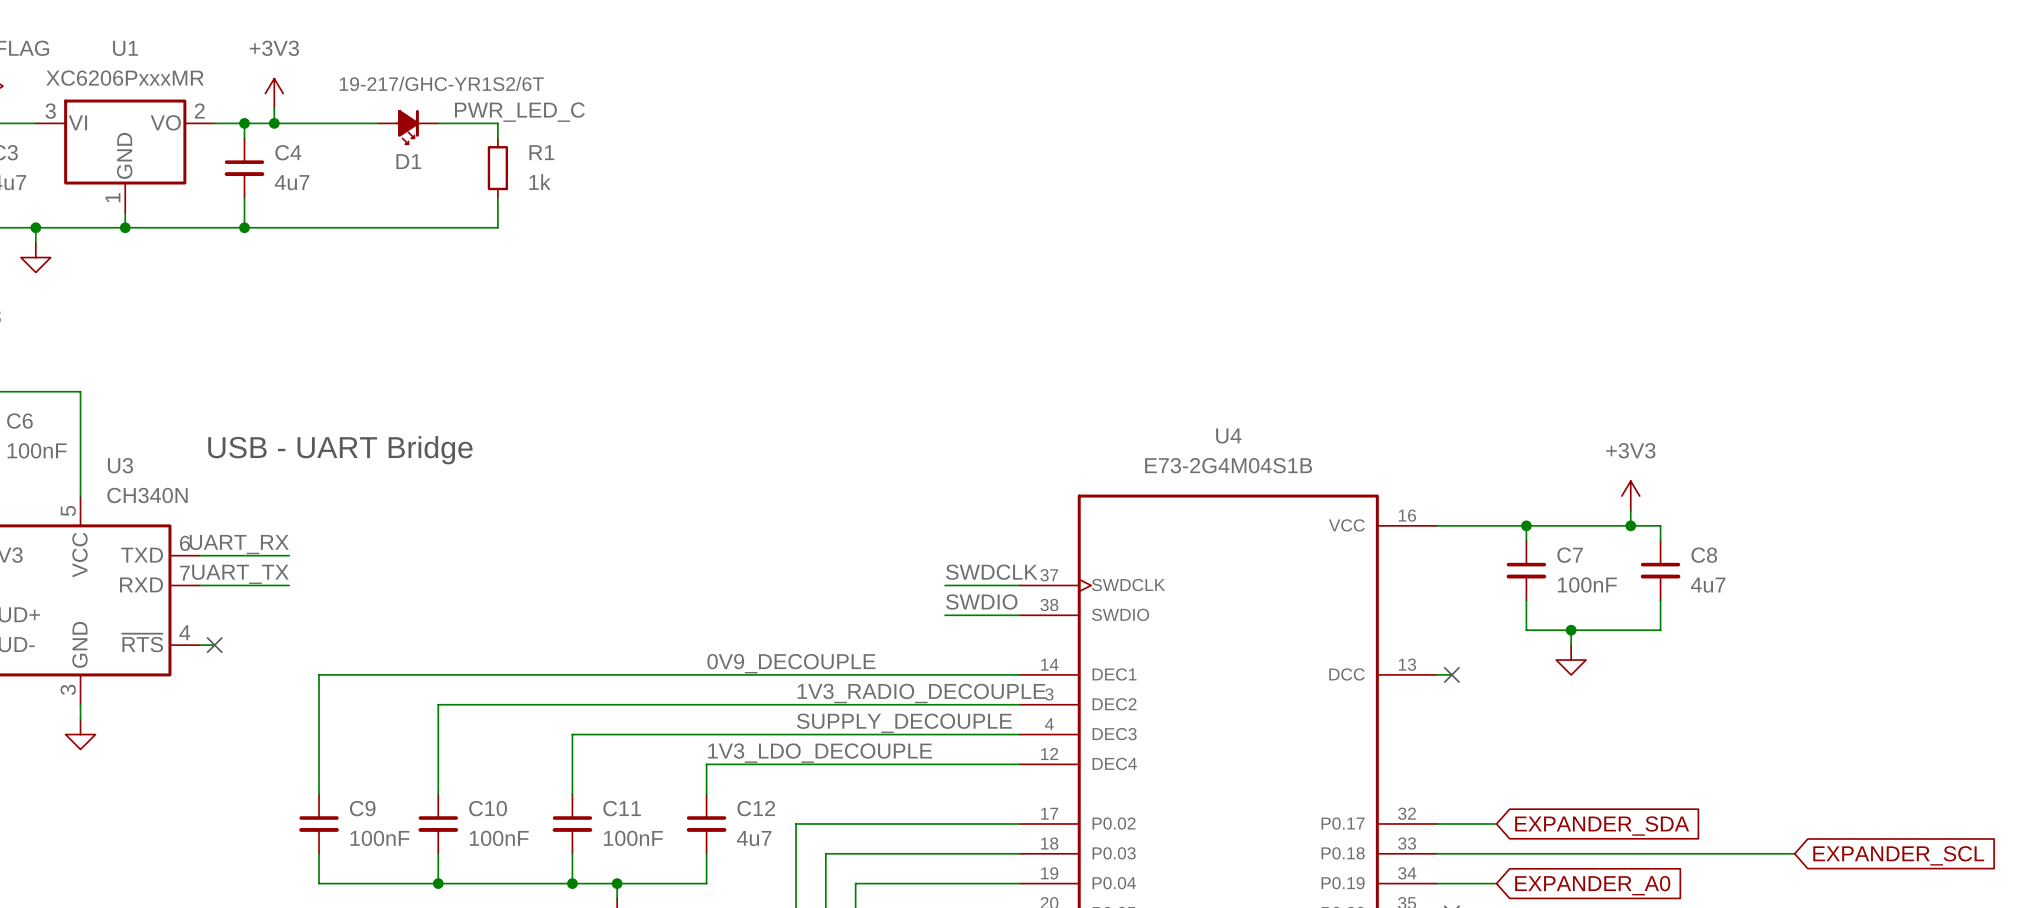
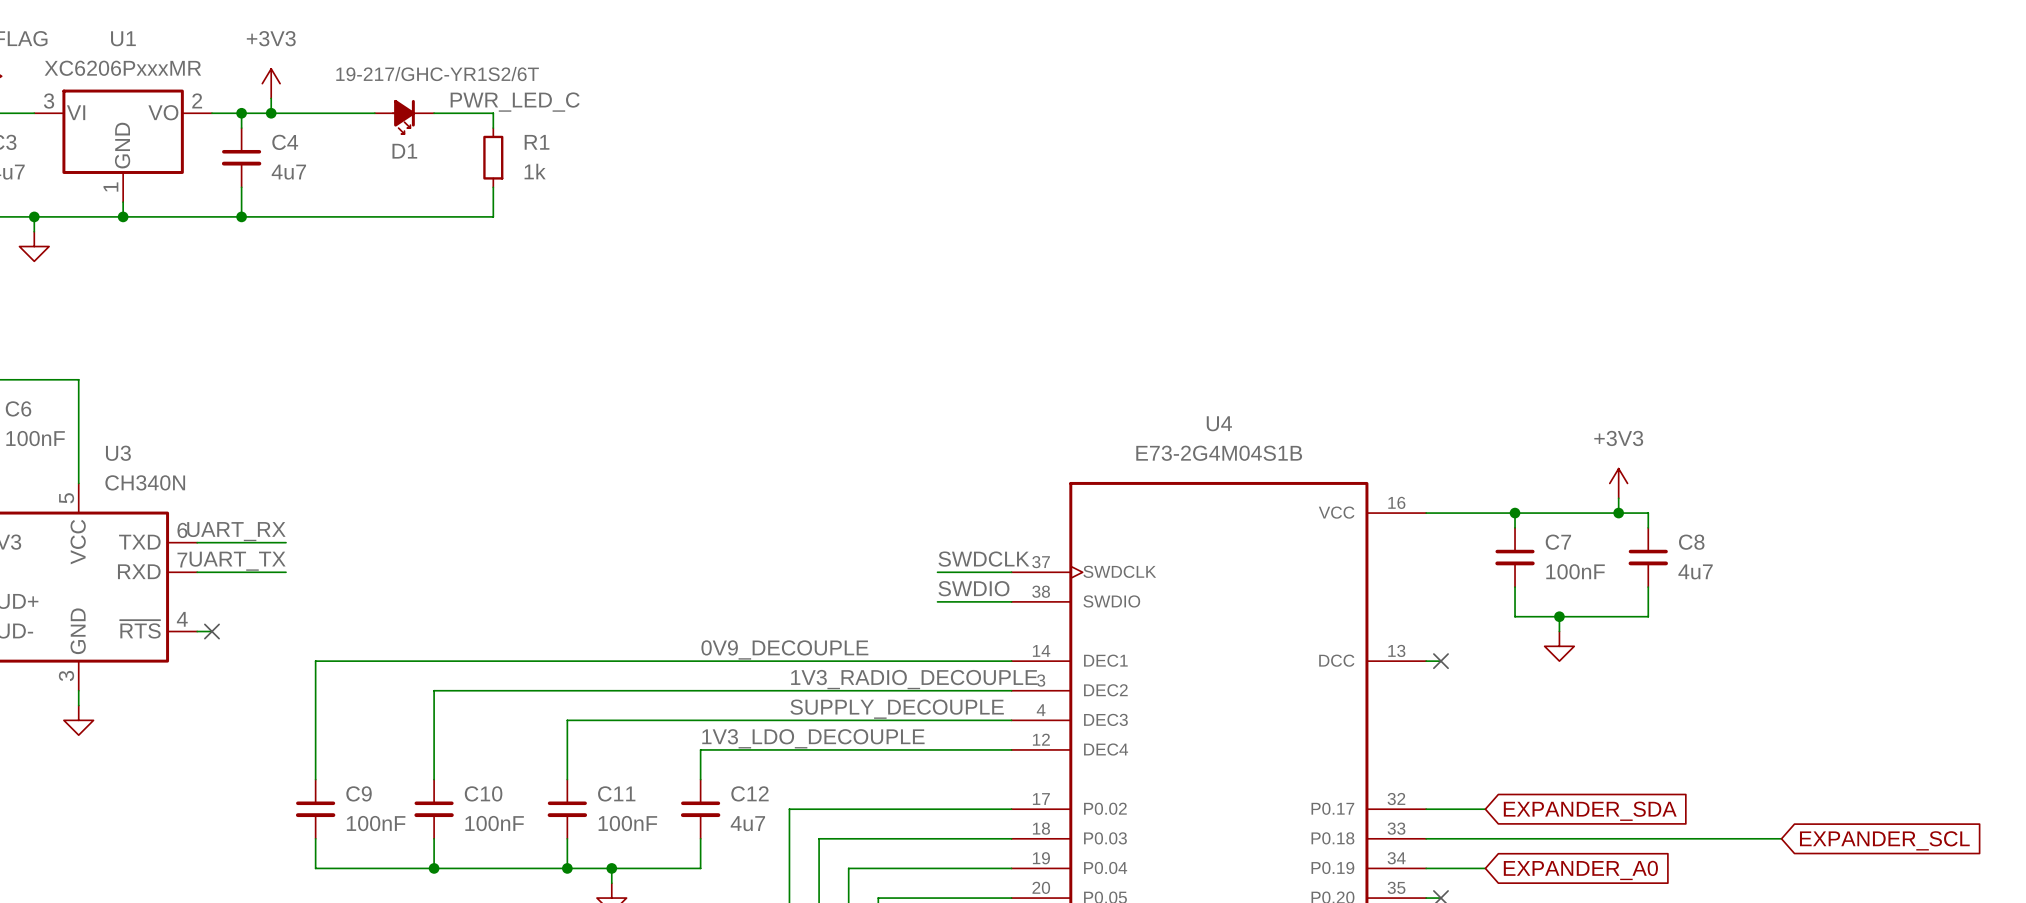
text: USB - UART Bridge (340, 450) -> none

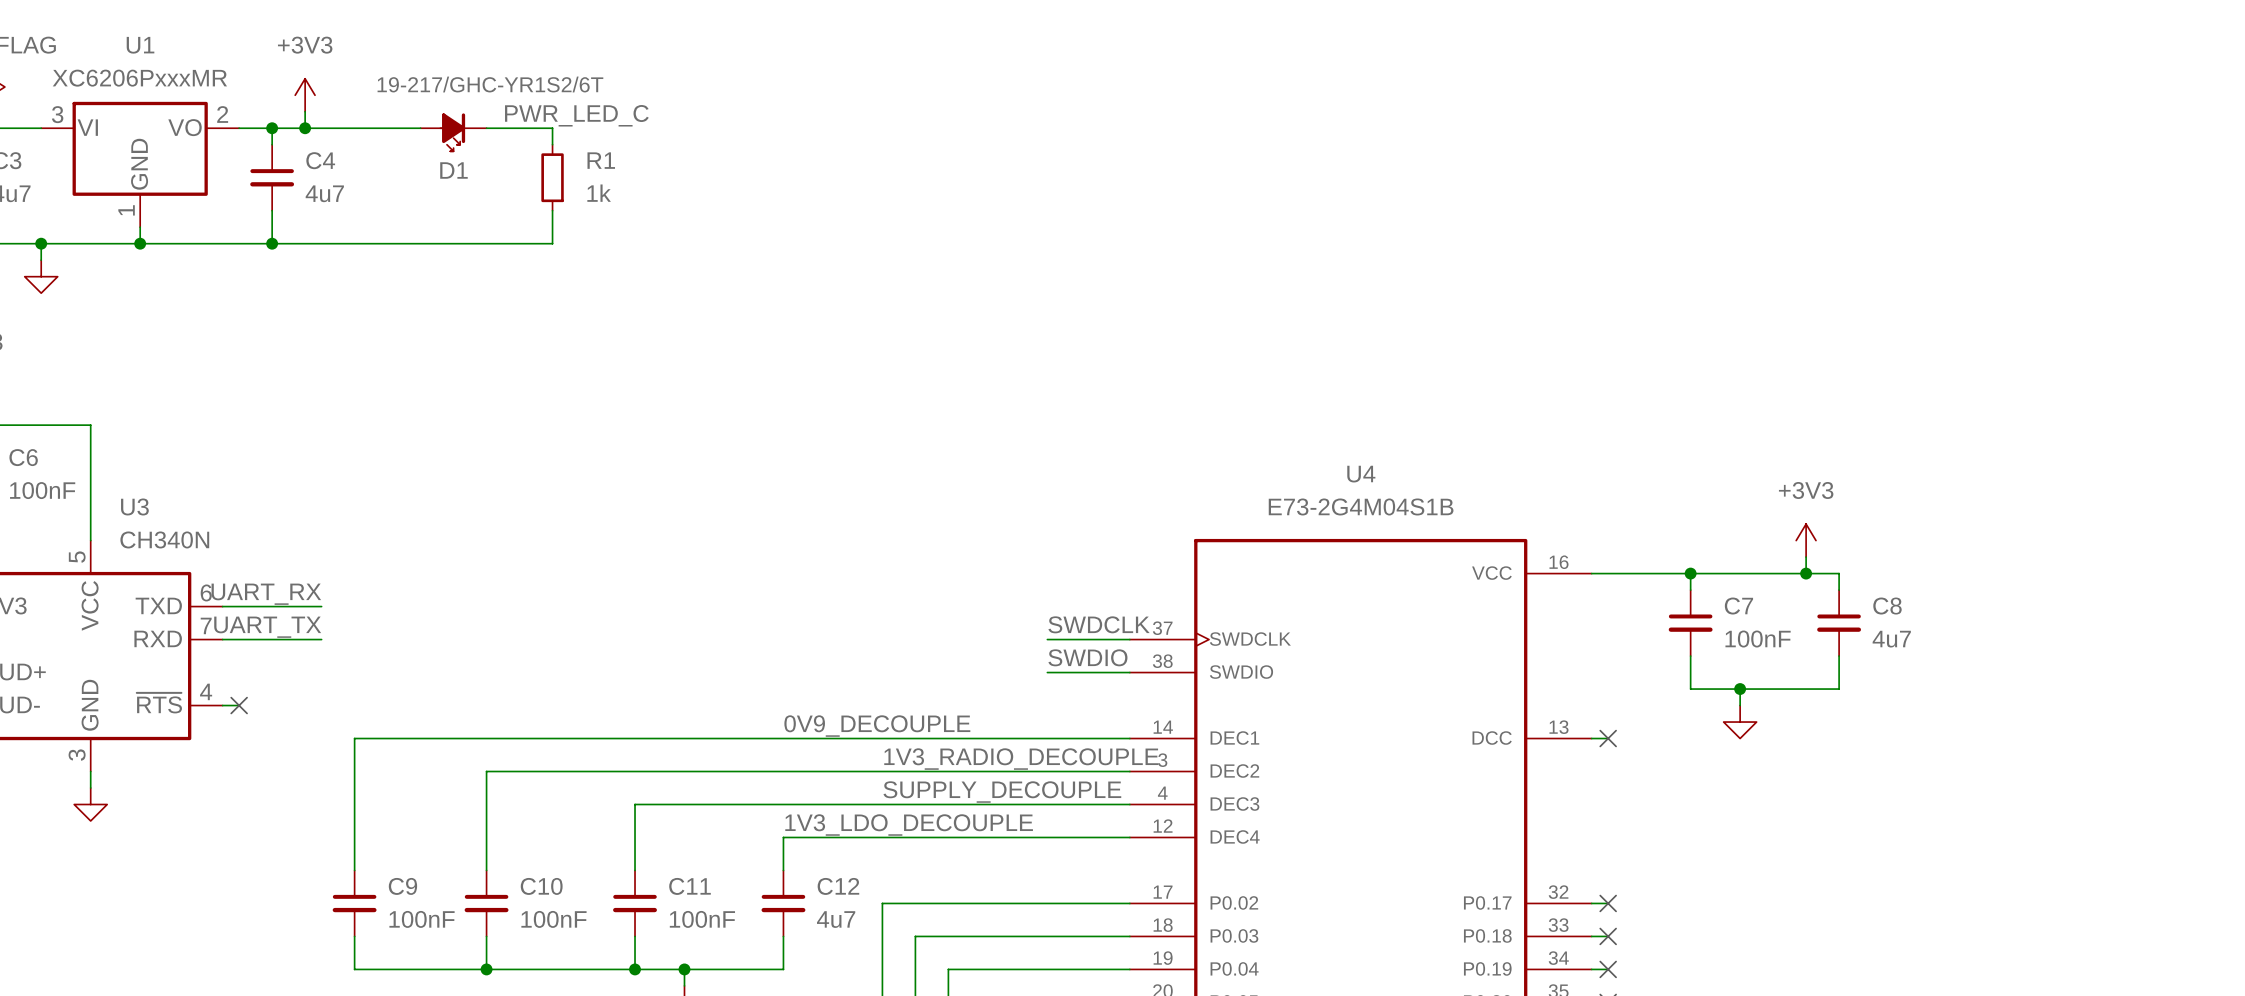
wire: (1440, 809) (1485, 809) -> none
no-connect mark: none -> (1608, 903)
global label: EXPANDER_SDA (1590, 811) -> none
wire: (1440, 838) (1781, 838) -> none
no-connect mark: none -> (1608, 936)
global label: EXPANDER_SCL (1884, 840) -> none
wire: (1440, 868) (1485, 868) -> none
no-connect mark: none -> (1608, 969)
global label: EXPANDER_A0 (1580, 870) -> none

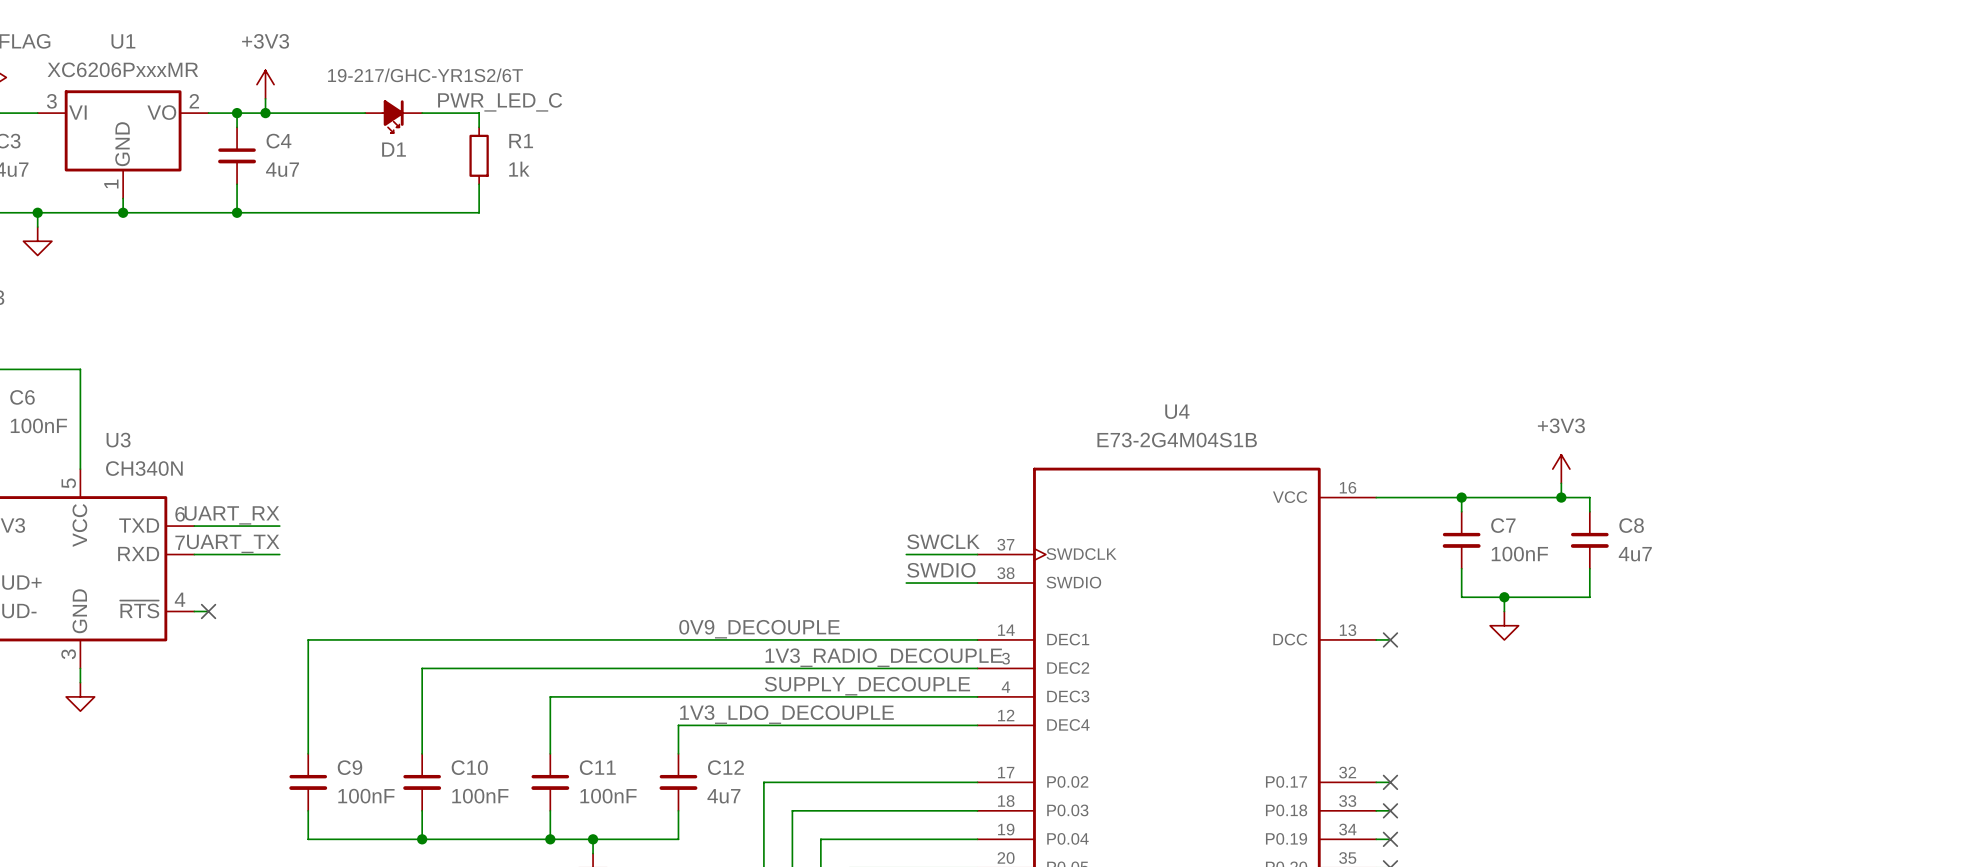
label: SWDCLK (1099, 624) -> SWCLK (943, 541)

